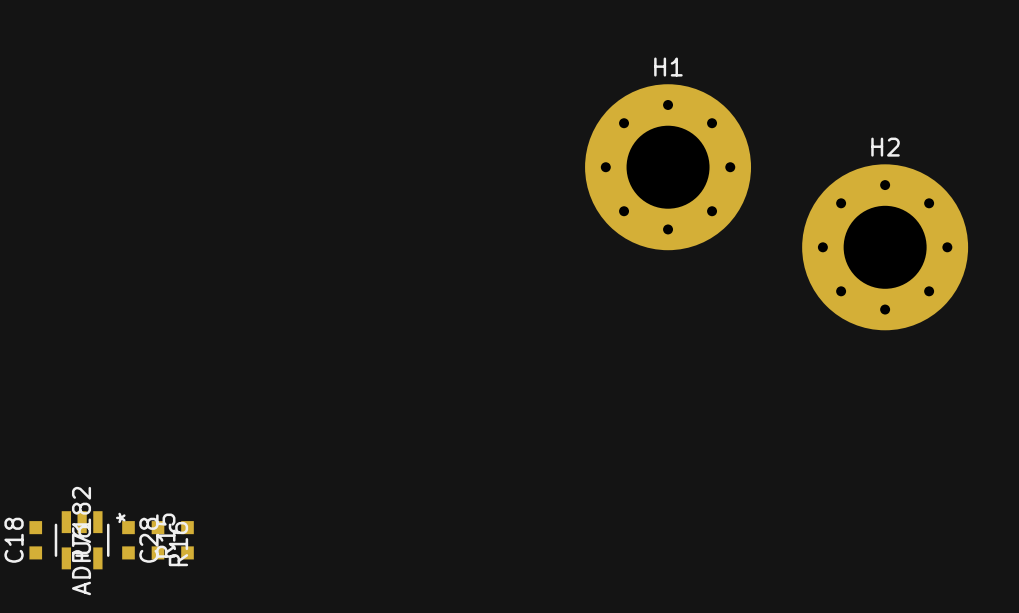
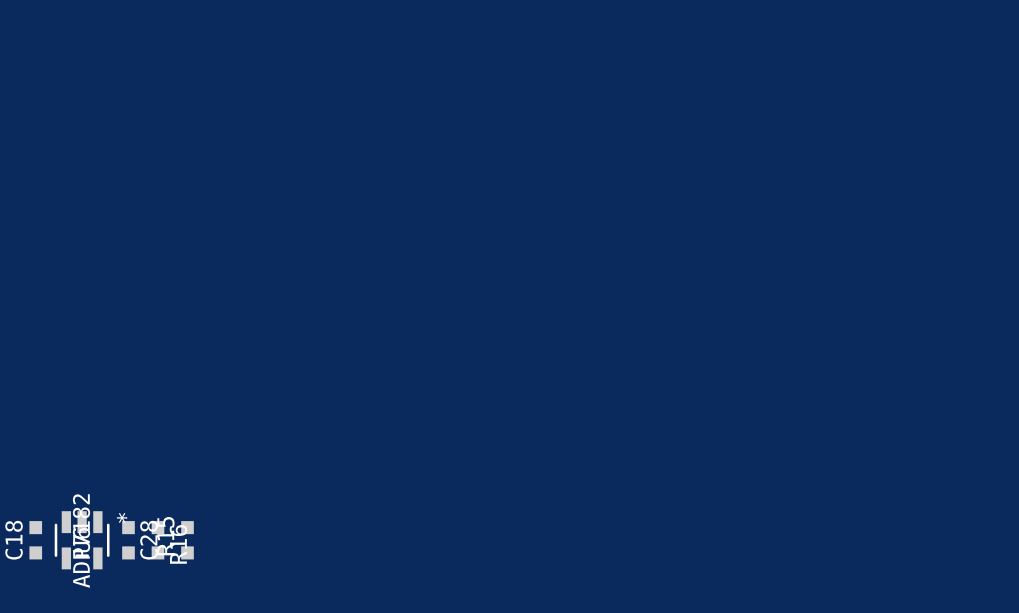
H1: (668, 167) -> none
H2: (885, 247) -> none

